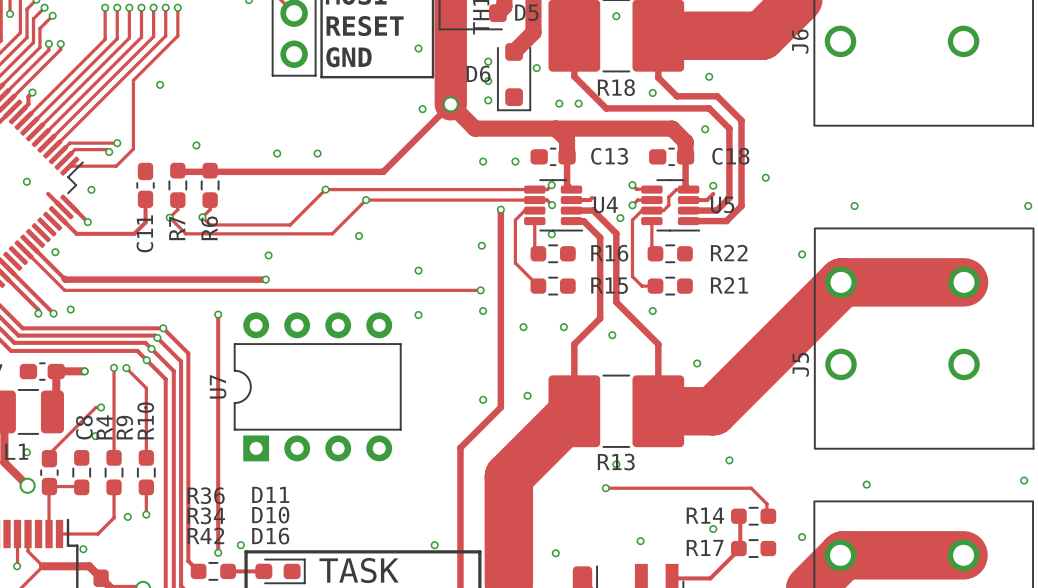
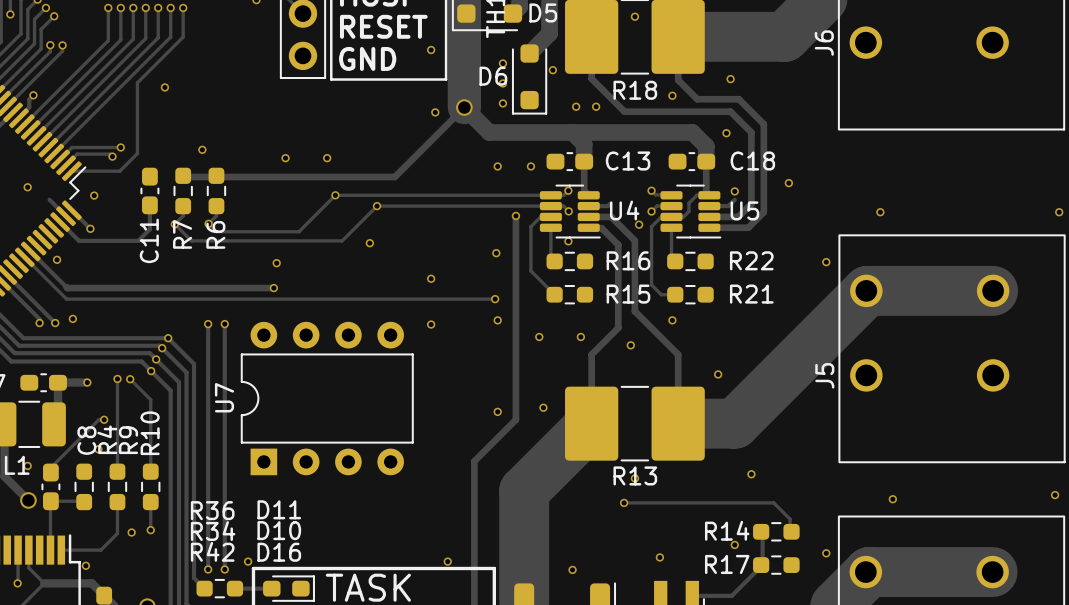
track: none -> (208, 324) (208, 569)
via: none -> (208, 324)
via: none -> (208, 569)

